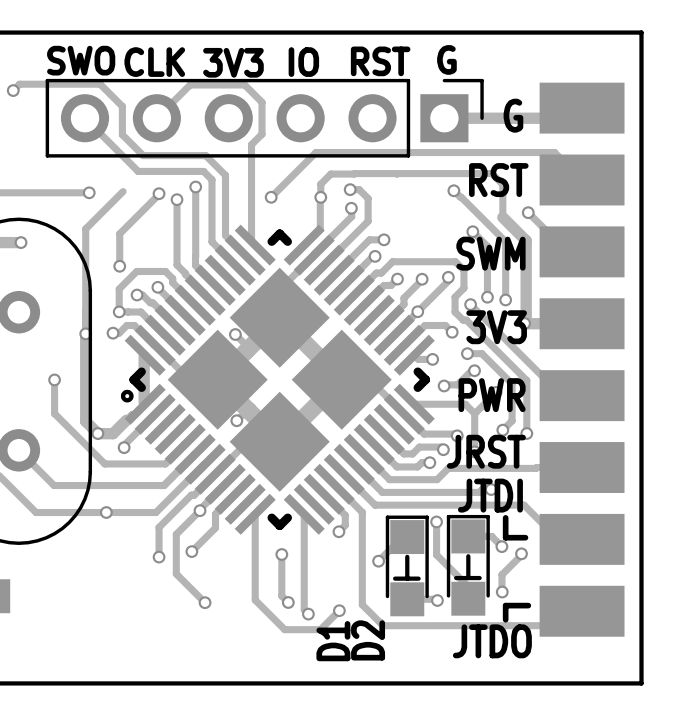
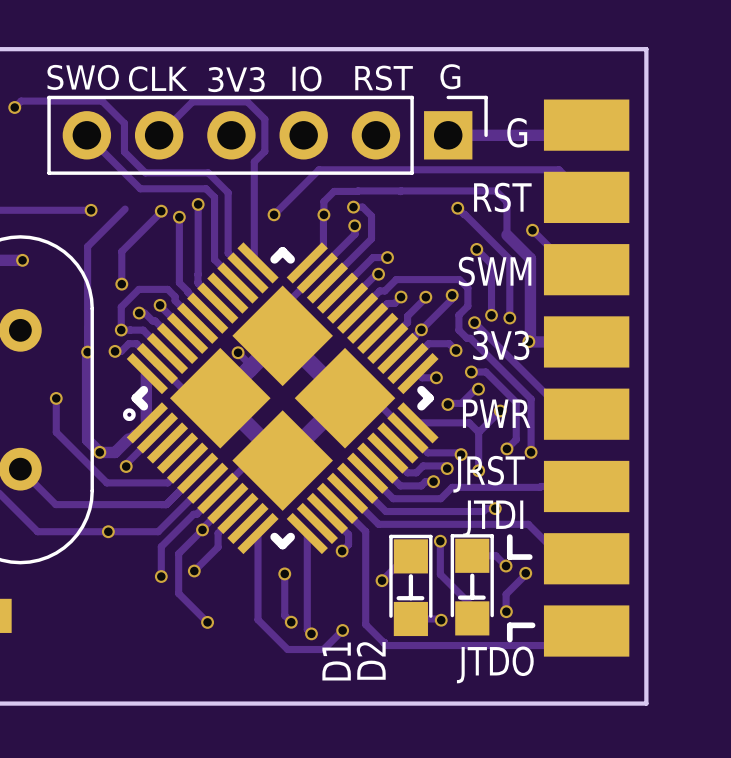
via: (236, 420) -> none

